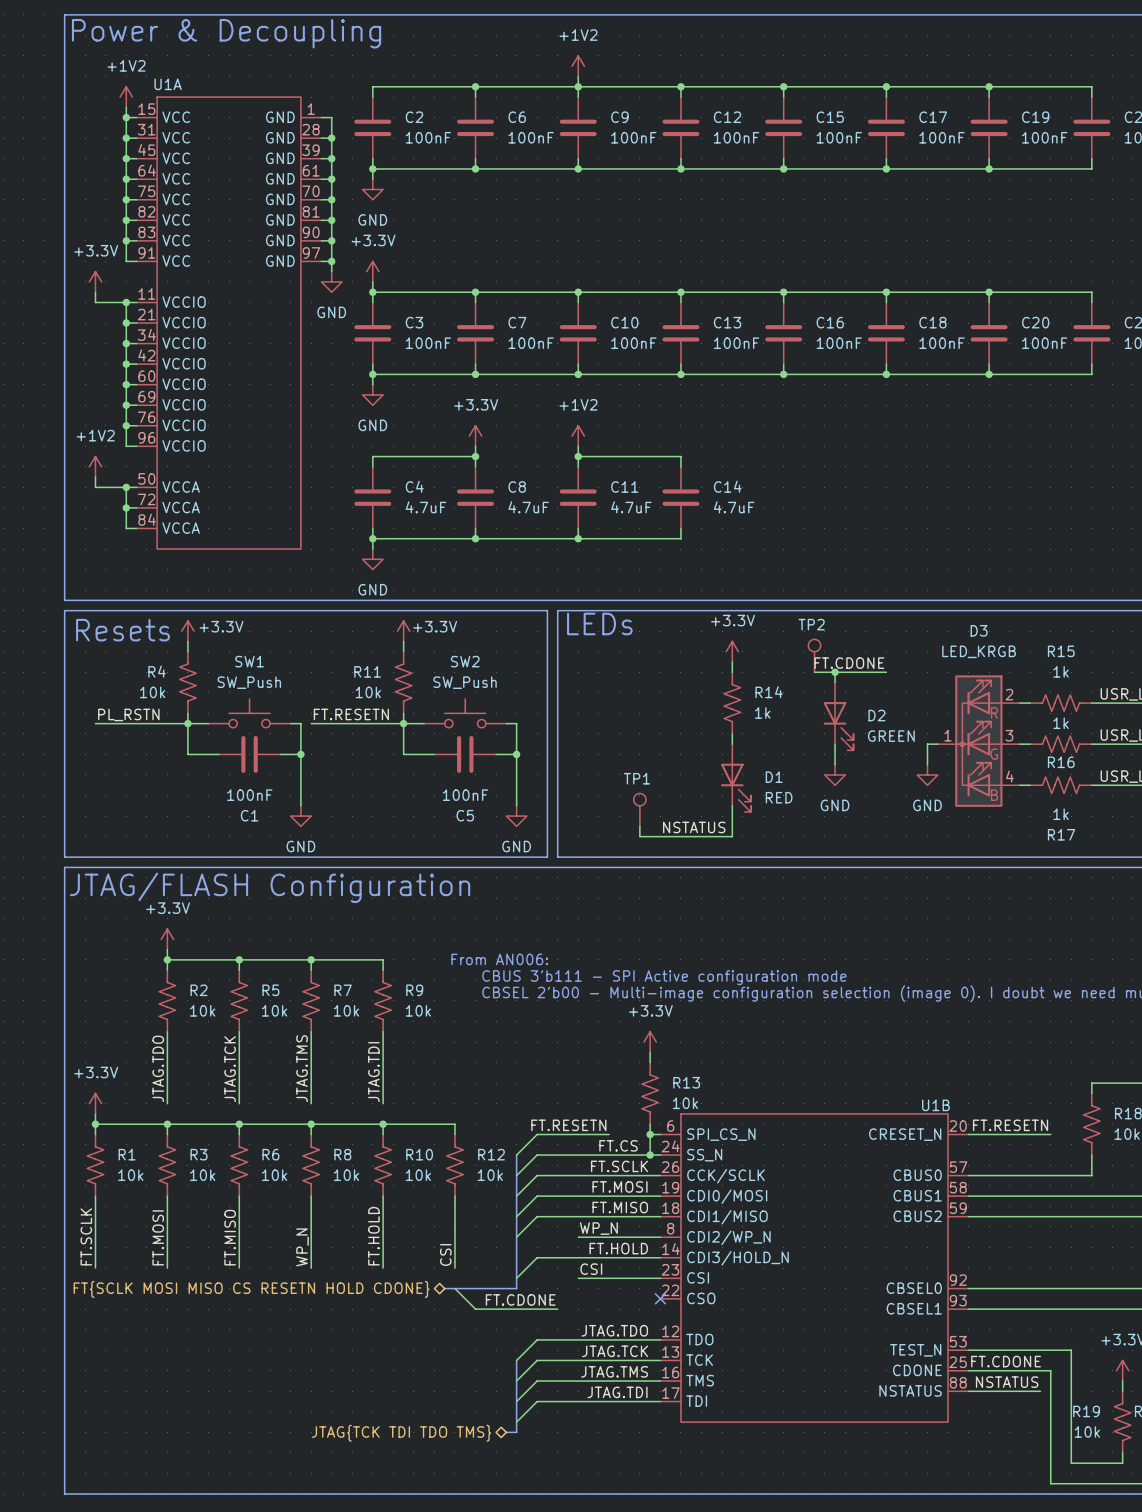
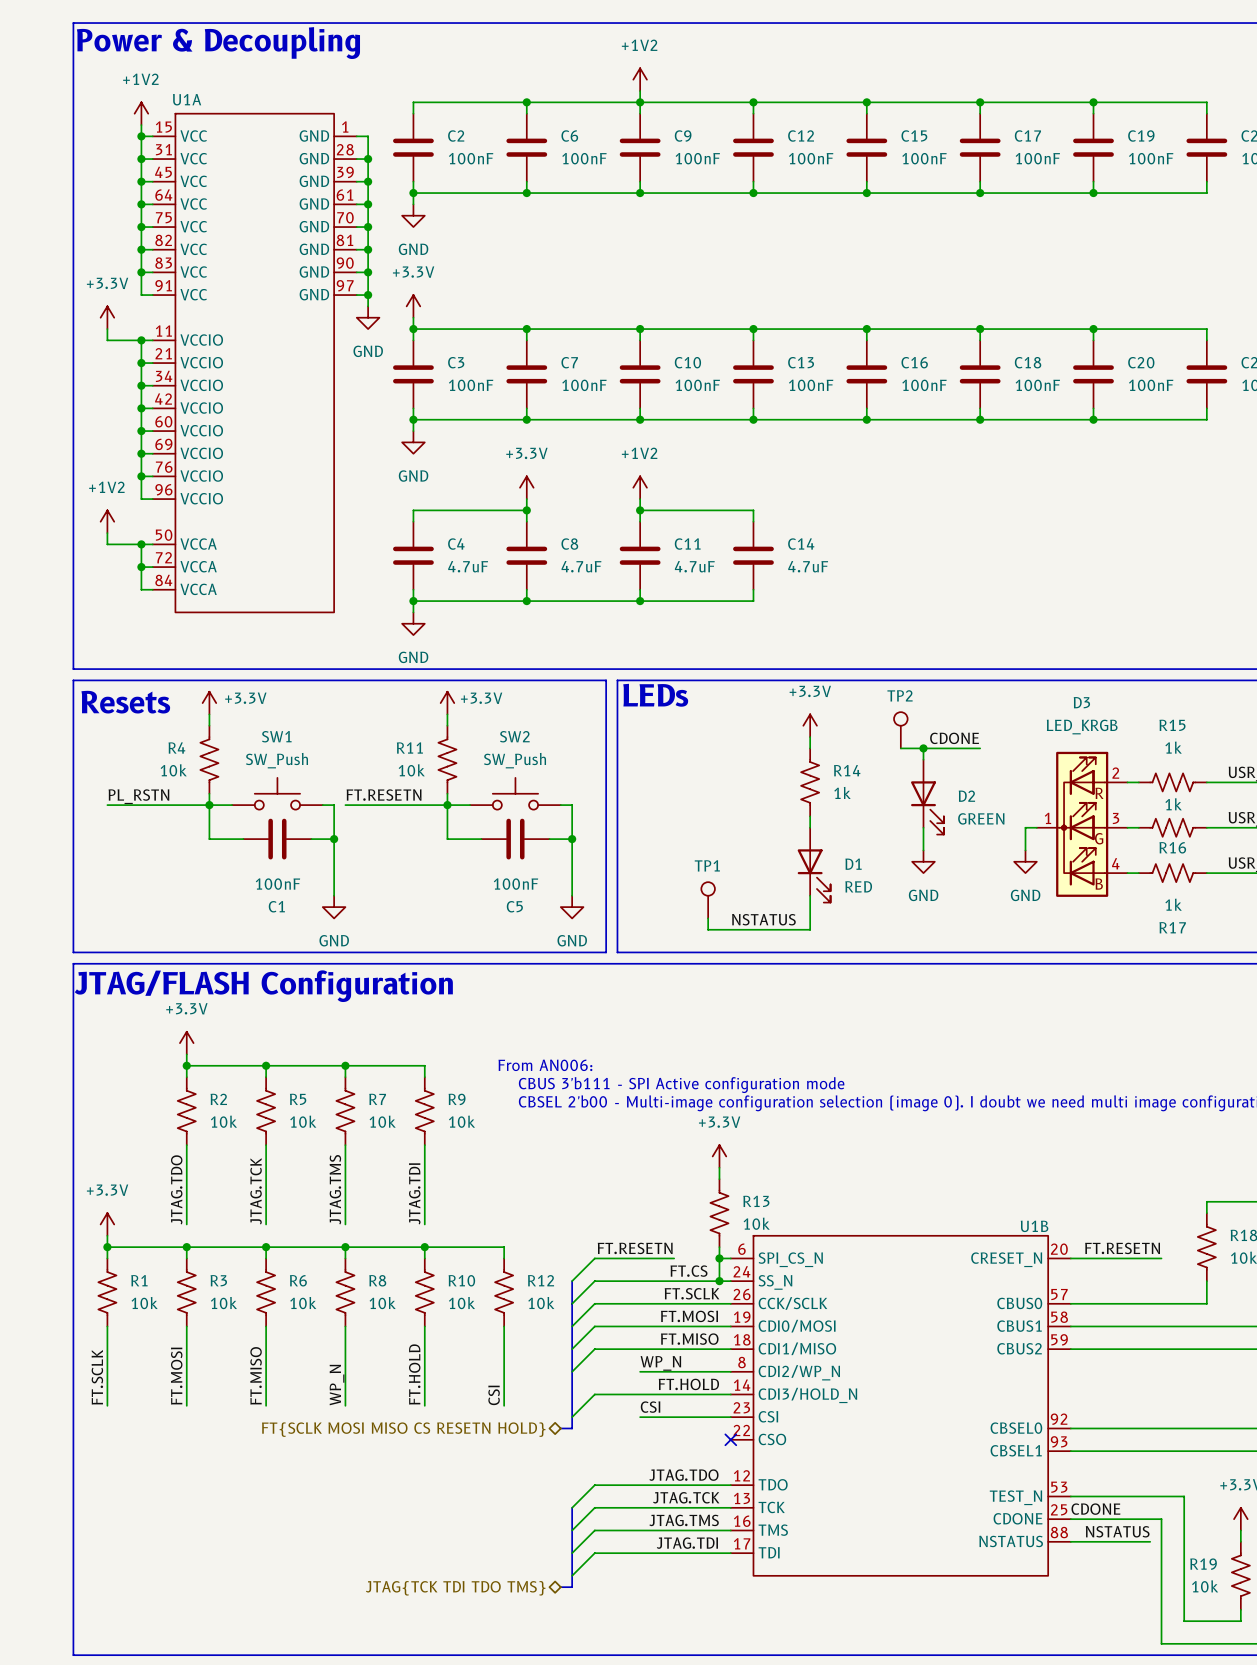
label: FT.CDONE (849, 663) -> CDONE (954, 738)
bus: (444, 1288) (506, 1288) -> none
wire: (454, 1288) (475, 1309) (557, 1309) -> none
hierarchical label: FT{SCLK MOSI MISO CS RESETN HOLD CDONE} (251, 1289) -> FT{SCLK MOSI MISO CS RESETN HOLD} (403, 1429)
label: FT.CDONE (520, 1299) -> none
label: FT.CDONE (1006, 1361) -> CDONE (1095, 1509)

